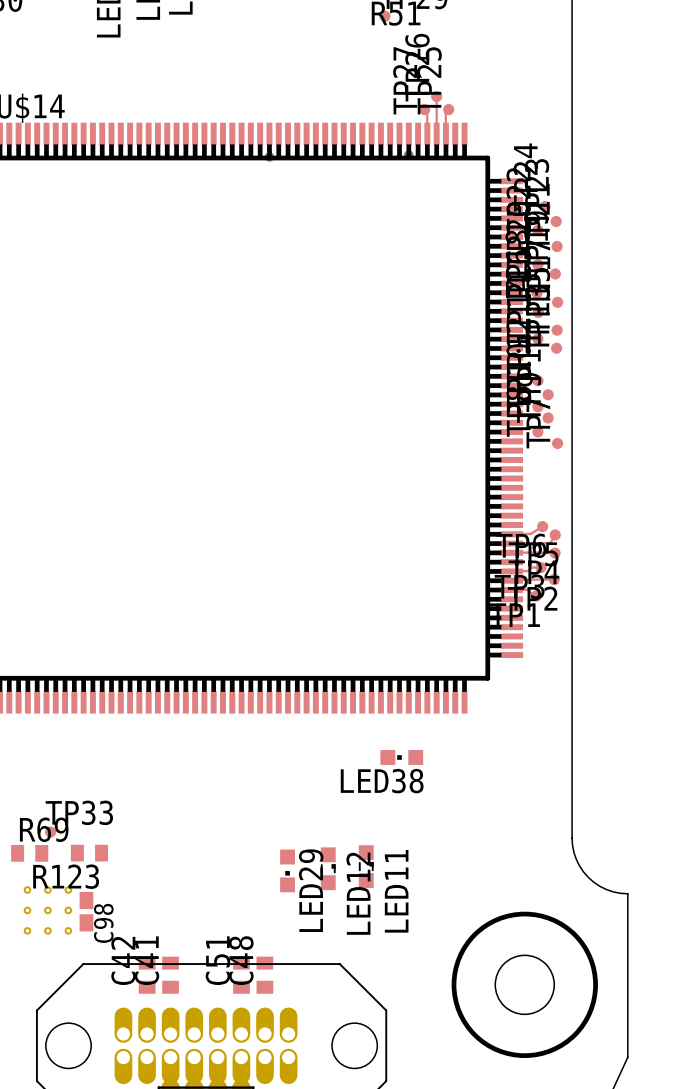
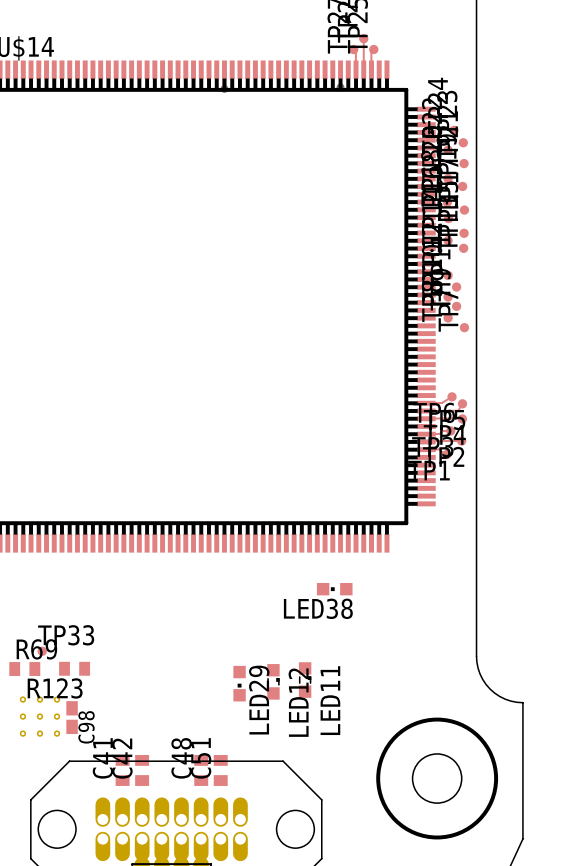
C42 name: C42 (123, 960) -> C41 (102, 758)
C41 name: C41 (146, 960) -> C42 (122, 758)
C51 name: C51 (217, 960) -> C48 (181, 758)
C48 name: C48 (241, 960) -> C51 (201, 758)

